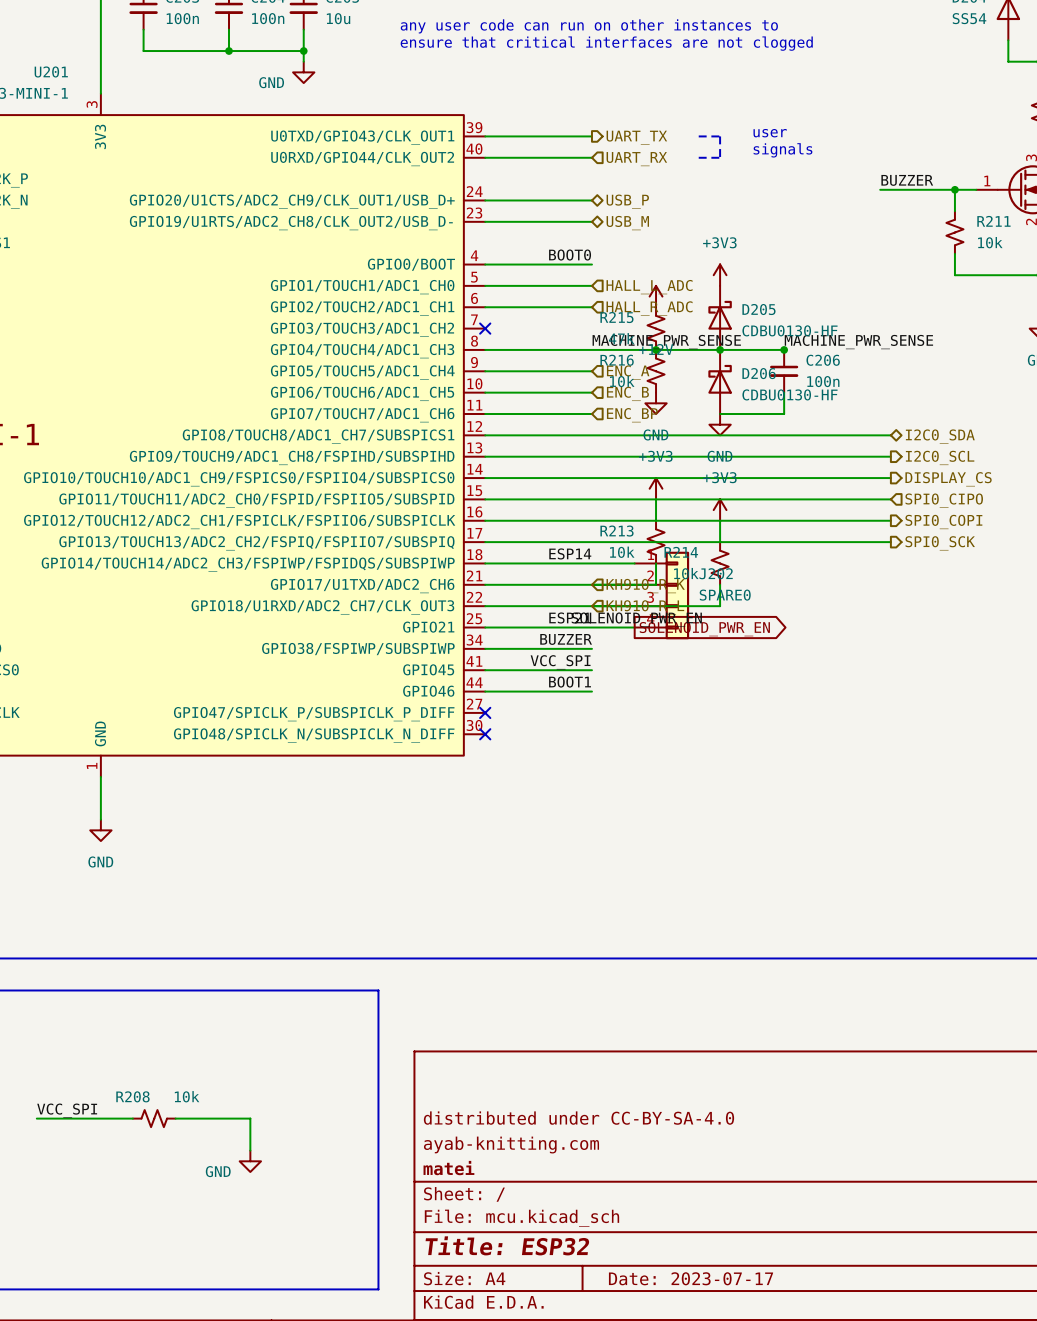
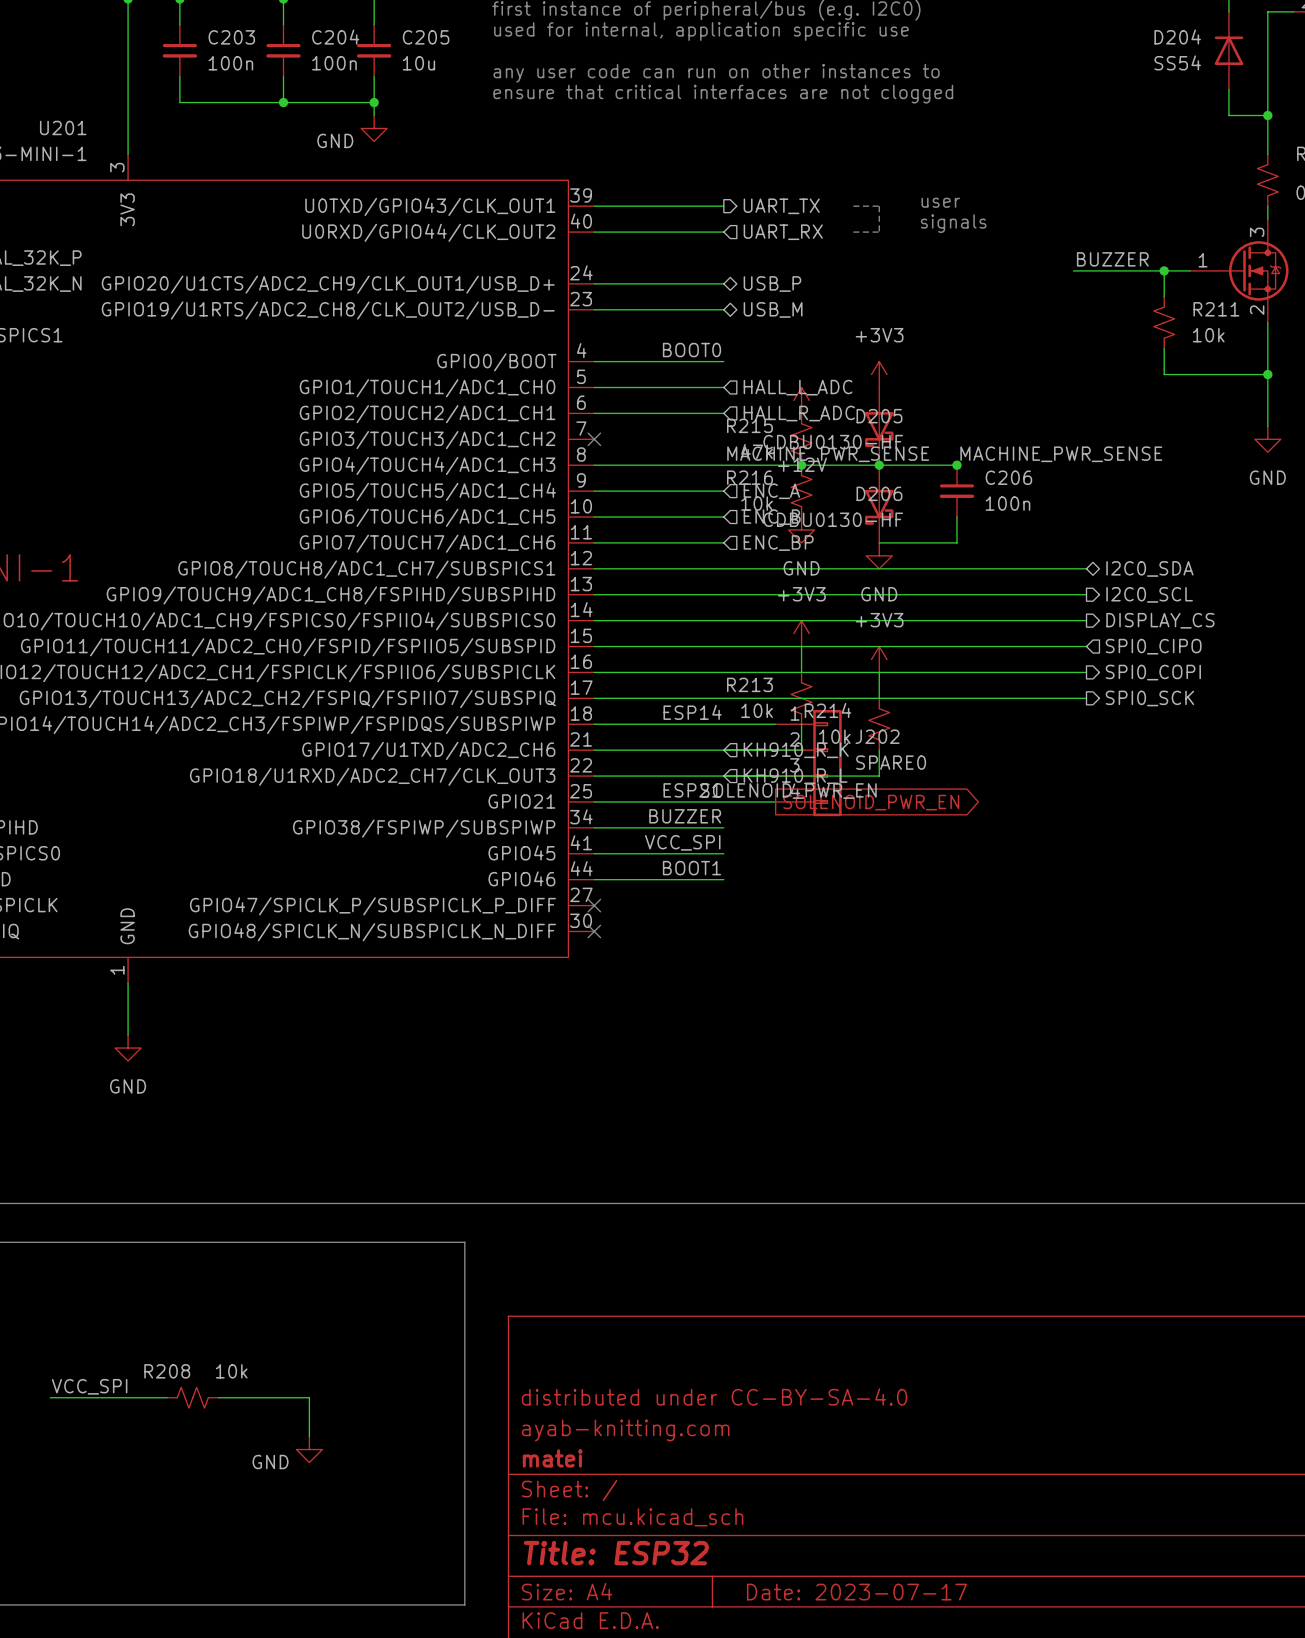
D205 name position: D205 (758, 309) -> D205 (879, 416)
D205 rotation: 0° (720, 315) -> 180° (879, 429)
D205 value position: CDBU0130-HF (789, 330) -> CDBU0130-HF (833, 442)
D206 name position: D206 (759, 373) -> D206 (879, 493)
D206 rotation: 0° (720, 379) -> 180° (879, 507)
D206 value position: CDBU0130-HF (789, 394) -> CDBU0130-HF (833, 519)

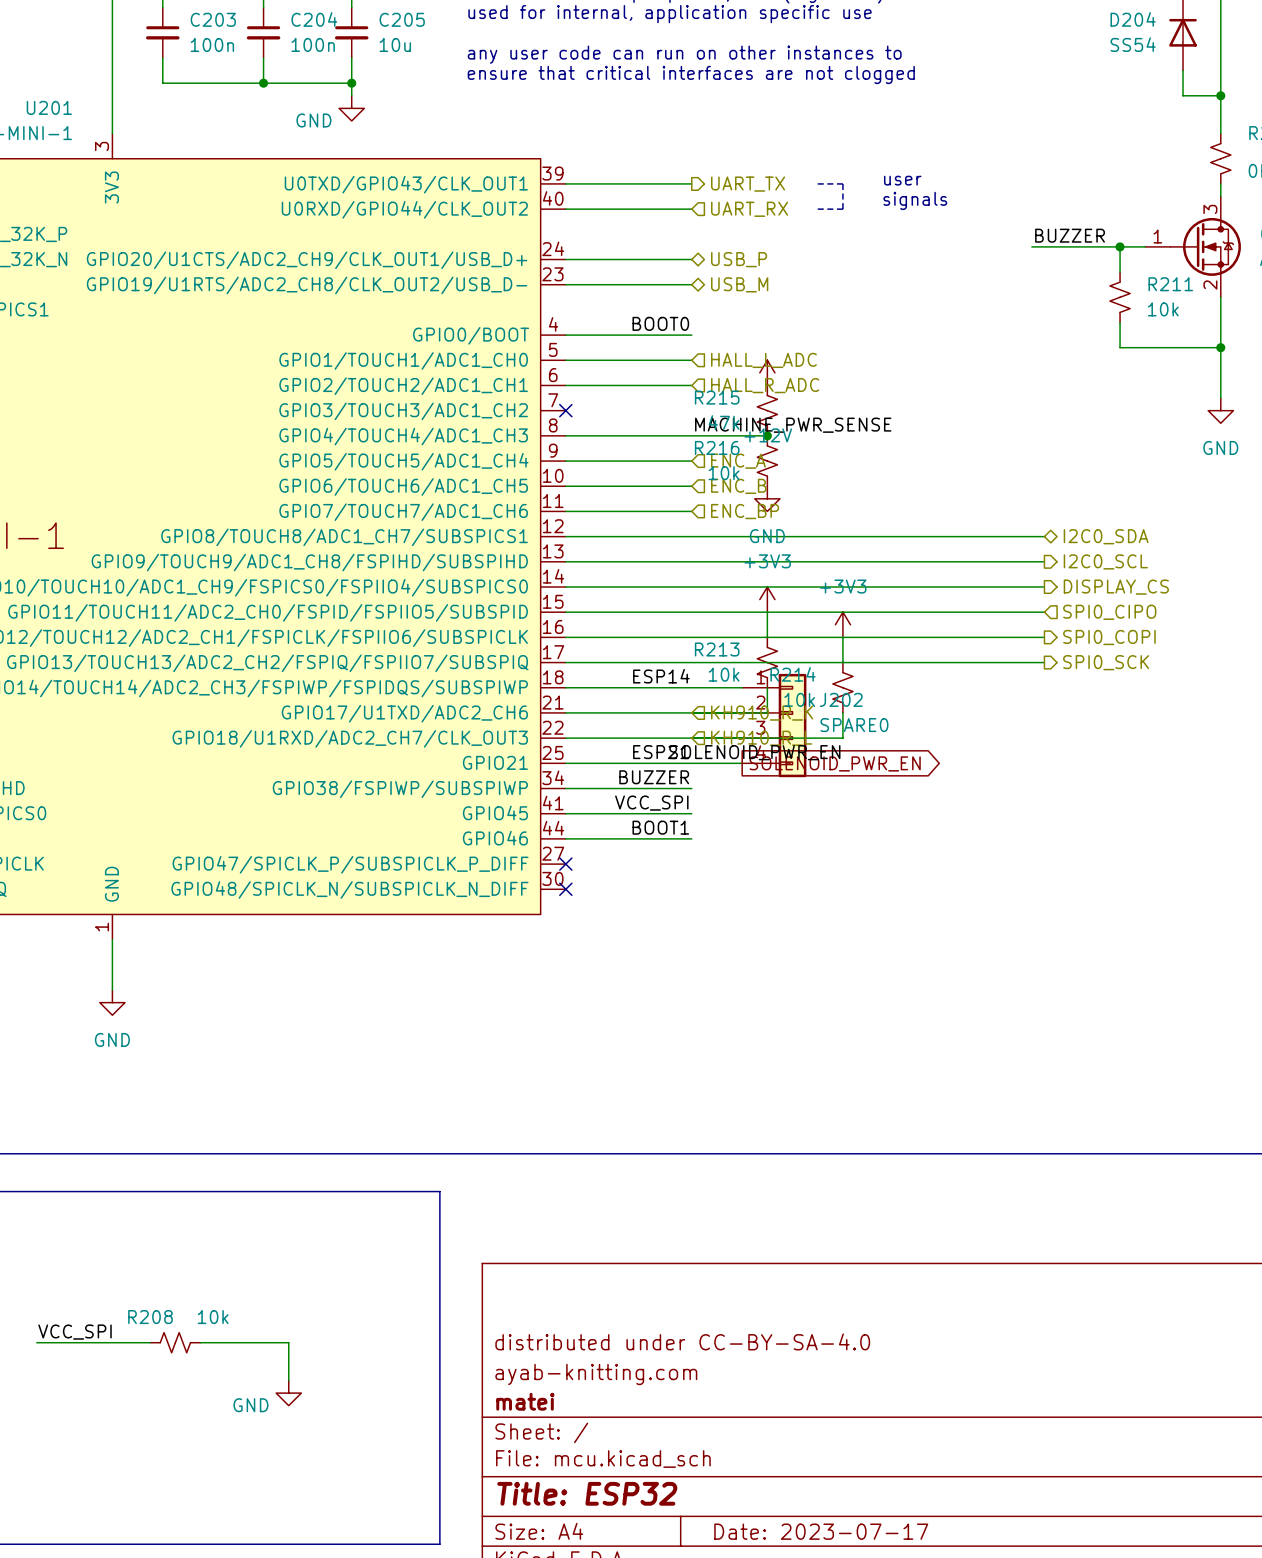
power symbol: +3V3 (879, 374) -> none
D205: CDBU0130-HF (879, 426) -> none
label: MACHINE_PWR_SENSE (1061, 454) -> none
wire: (801, 465) (956, 465) -> none
junction: (879, 465) -> none
junction: (956, 465) -> none
C206: 100n (956, 491) -> none
D206: CDBU0130-HF (879, 504) -> none
wire: (956, 517) (956, 542) (879, 542) -> none
power symbol: GND (879, 555) -> none

